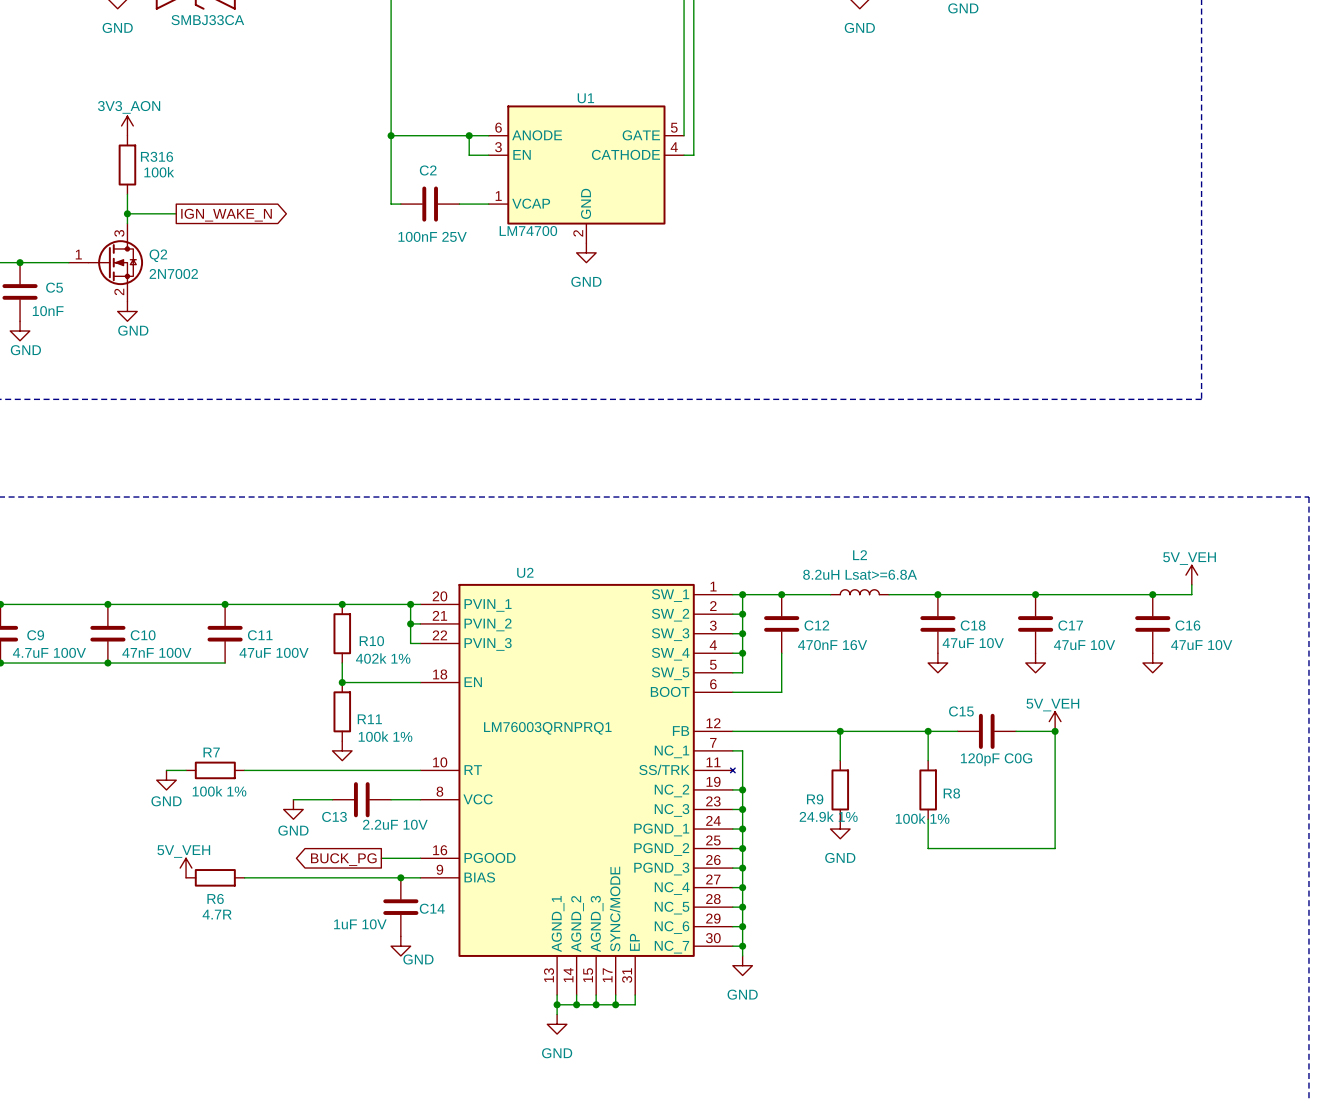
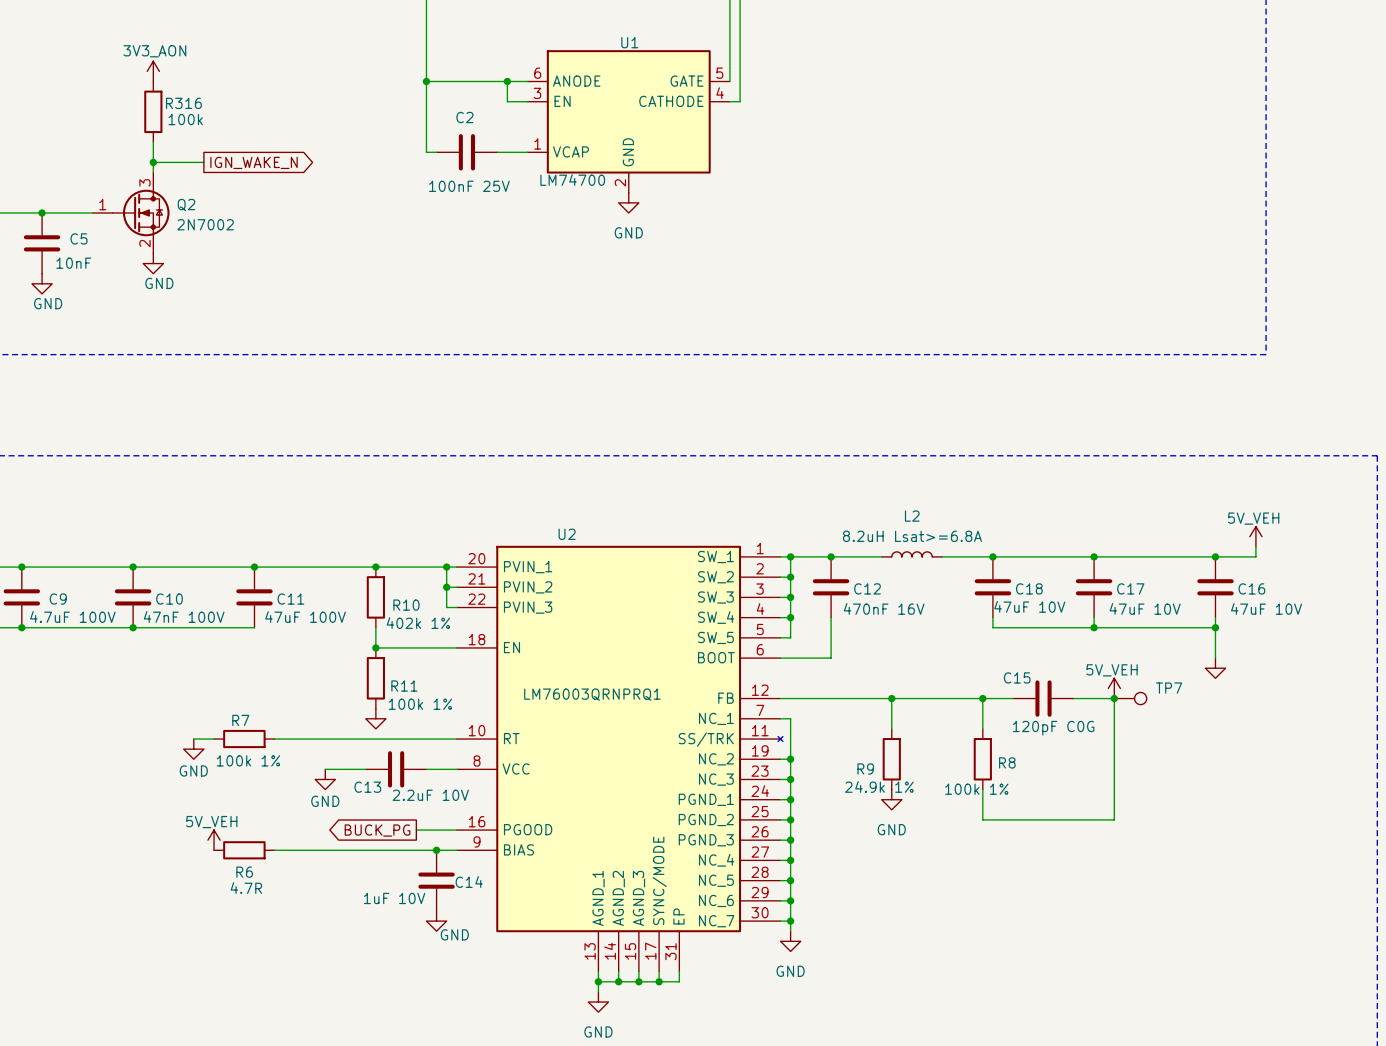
wire: none -> (992, 617) (992, 627) (1215, 627)
wire: none -> (1215, 617) (1215, 658)
power symbol: (937, 663) -> none
power symbol: (1035, 663) -> none
junction: none -> (1094, 627)
power symbol position: (1152, 663) -> (1215, 668)
junction: none -> (1215, 627)
TP7: none -> (1130, 698)

